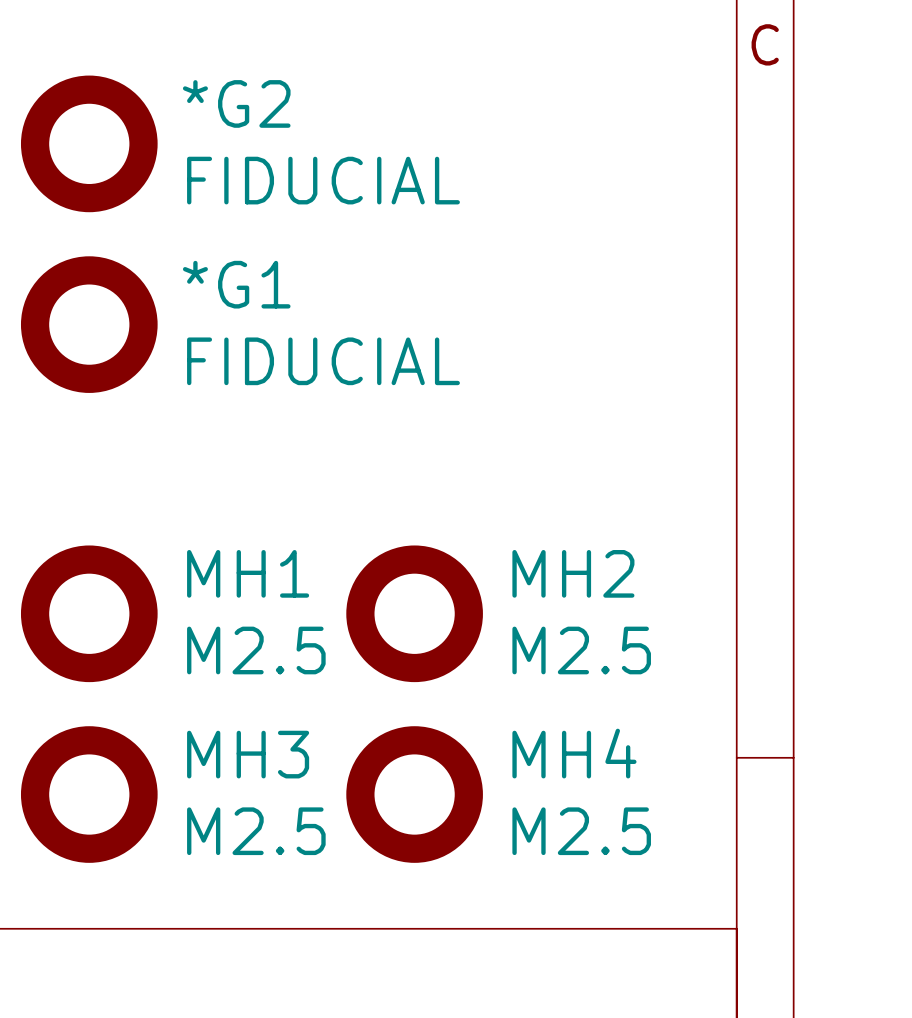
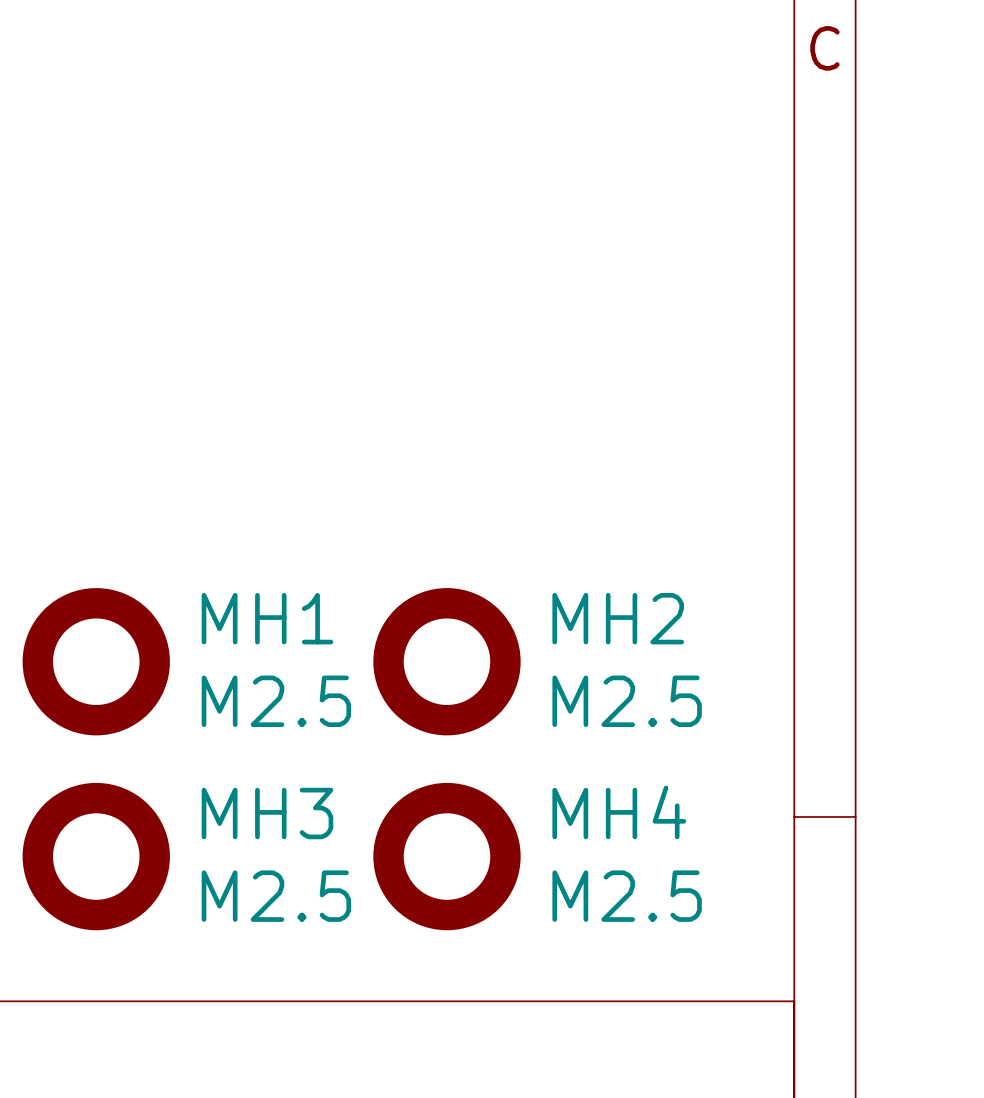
*G2: FIDUCIAL (89, 143) -> none
*G1: FIDUCIAL (89, 324) -> none

